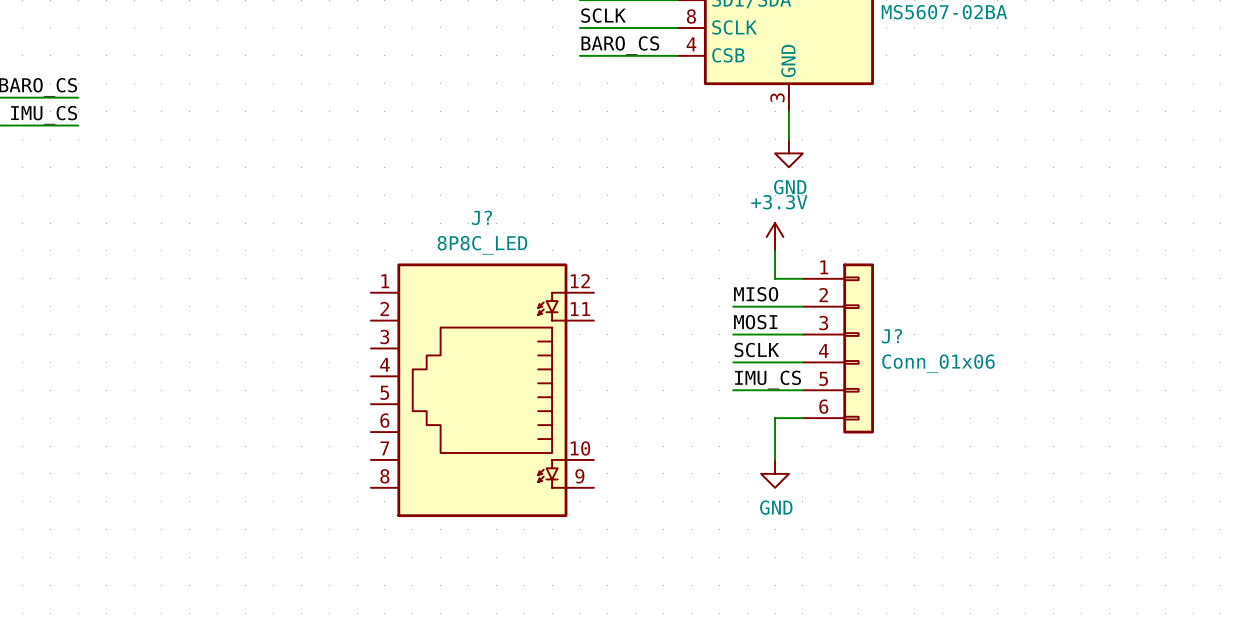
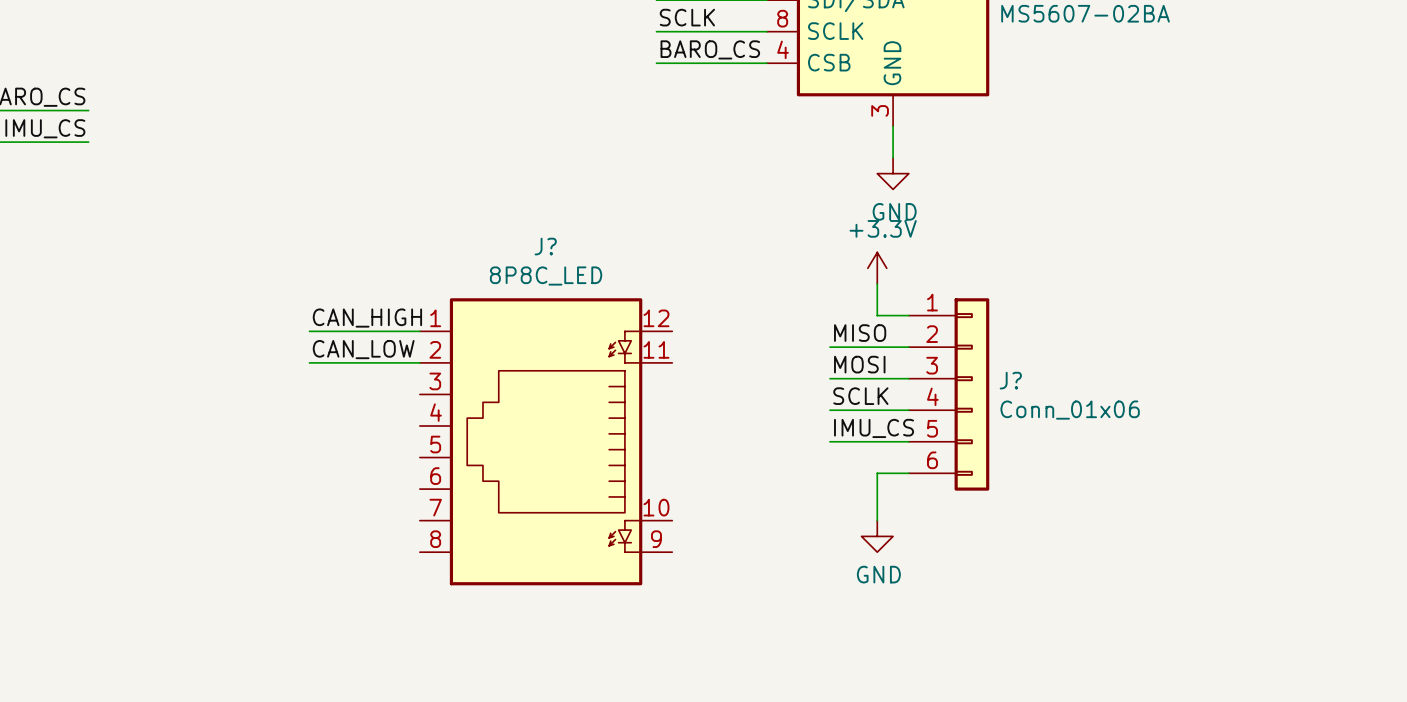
label: none -> CAN_HIGH (367, 318)
wire: none -> (309, 331) (419, 331)
label: none -> CAN_LOW (363, 349)
wire: none -> (309, 362) (419, 362)

